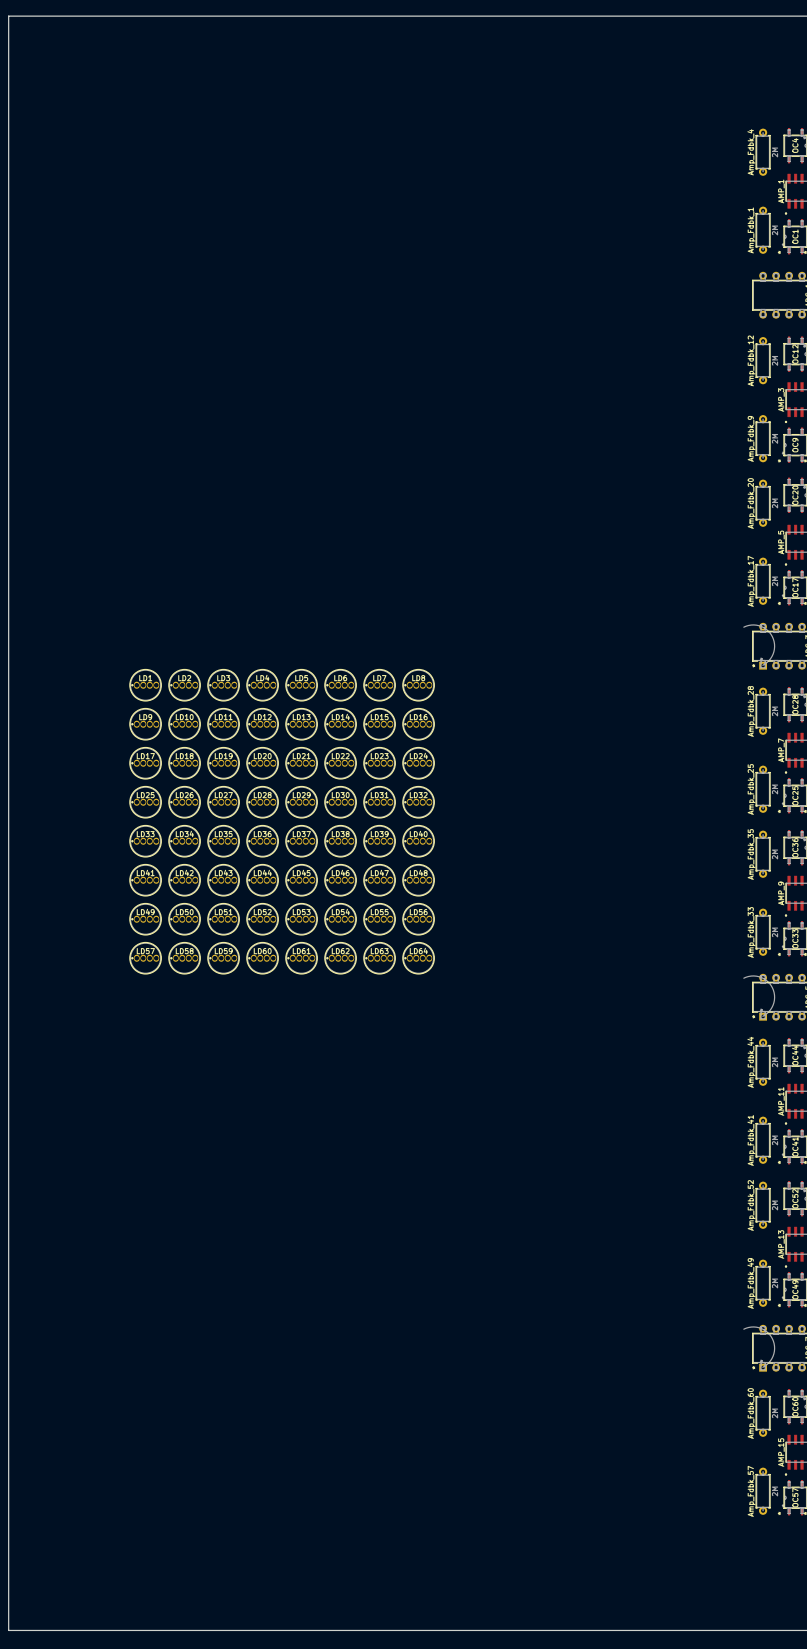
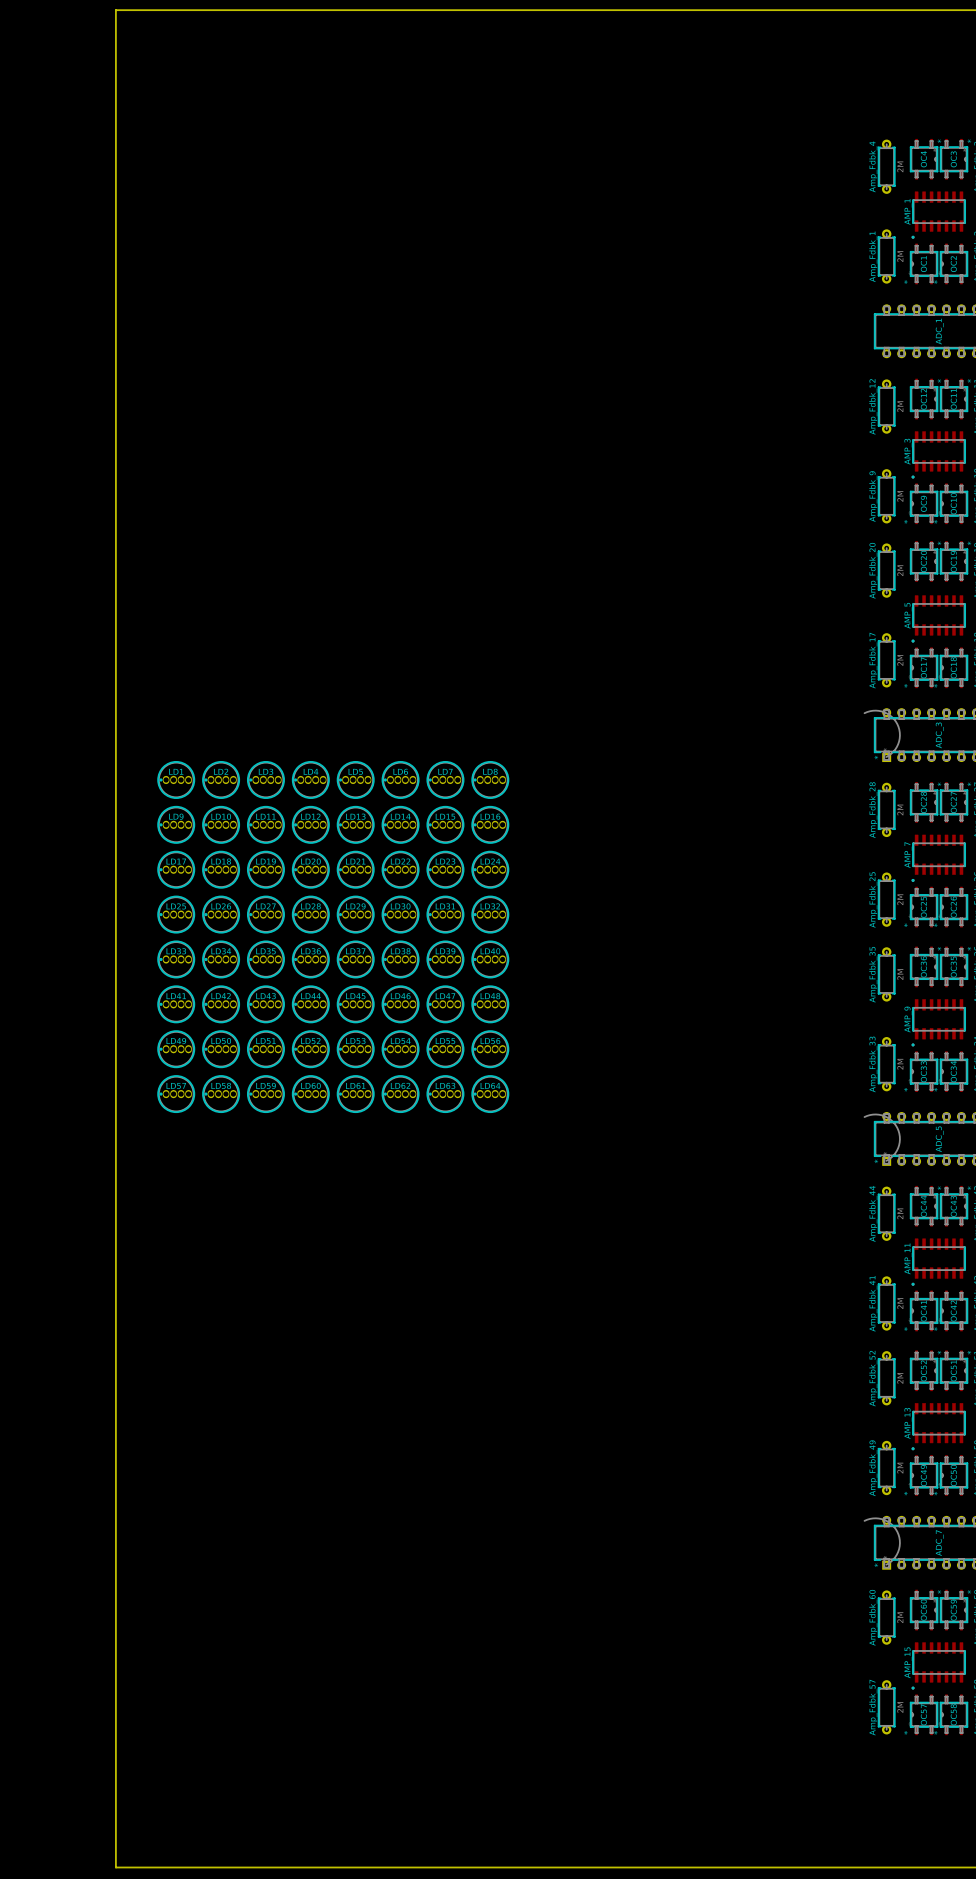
board edge: (93, 16) (8, 16) (8, 1630) (93, 1630) -> (115, 10) (115, 1867)

